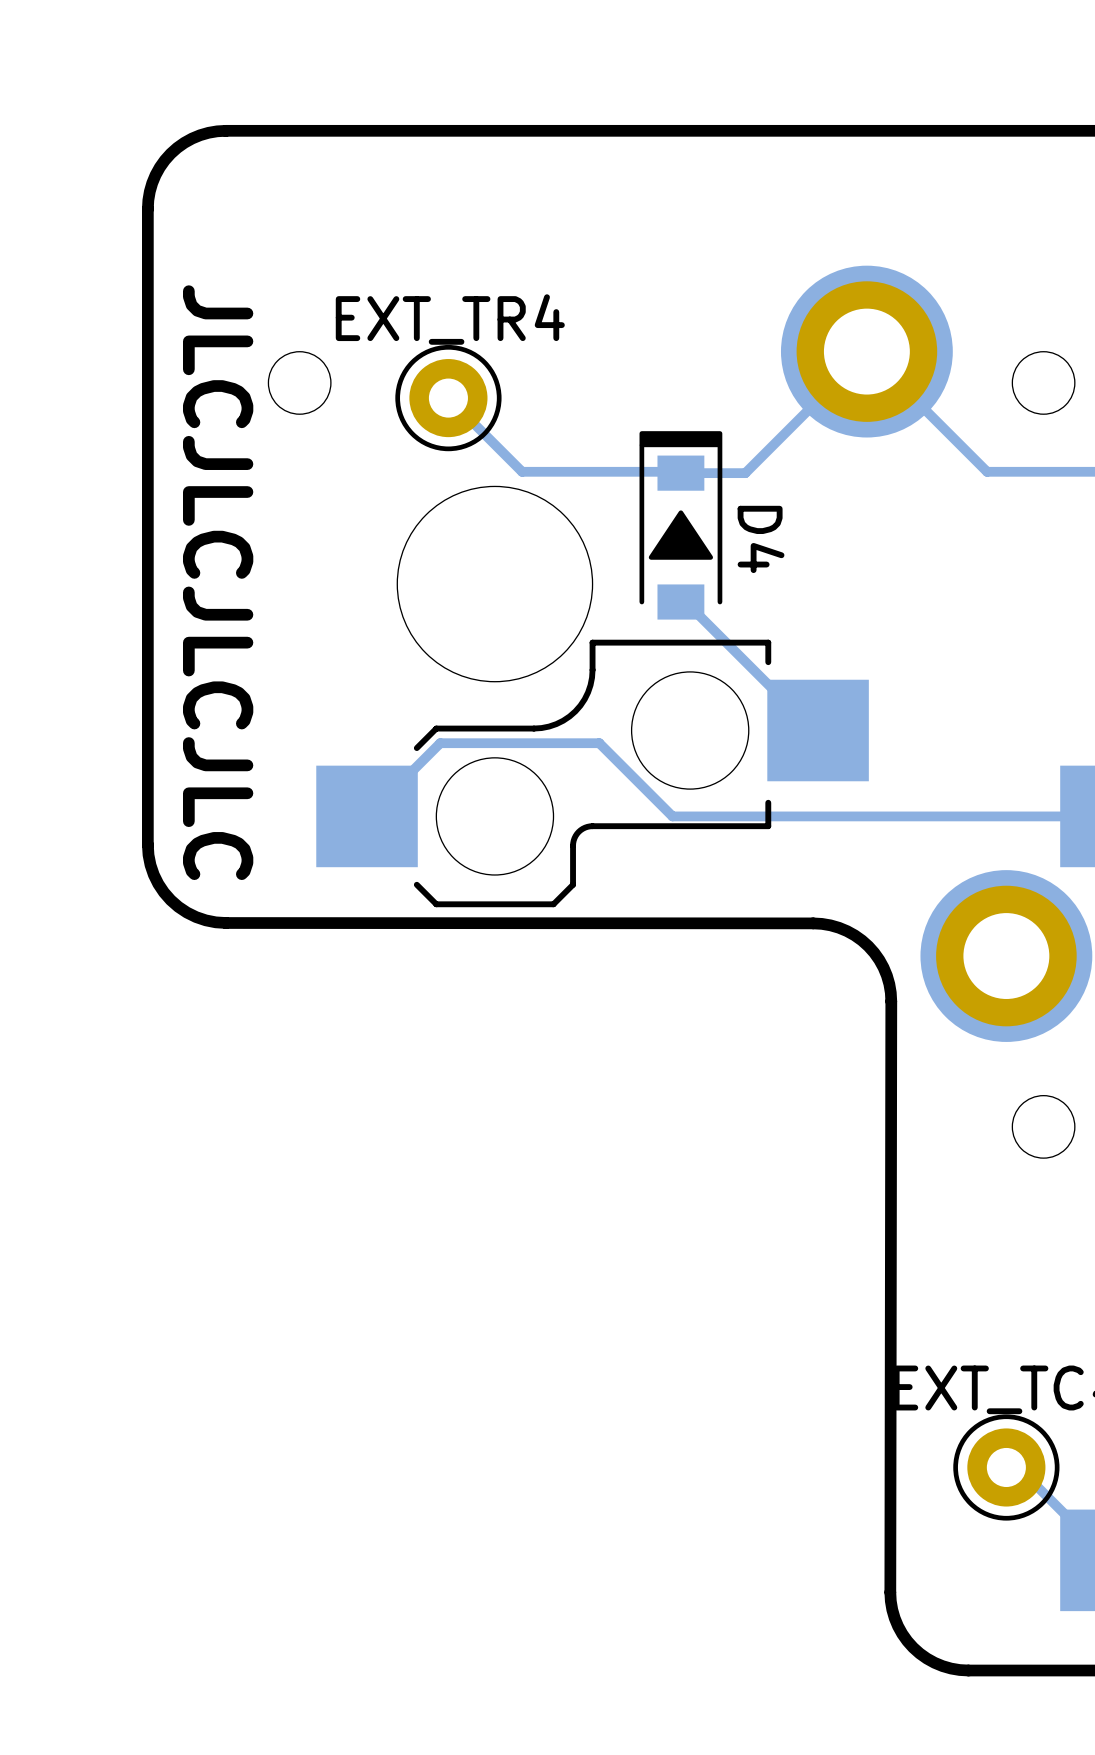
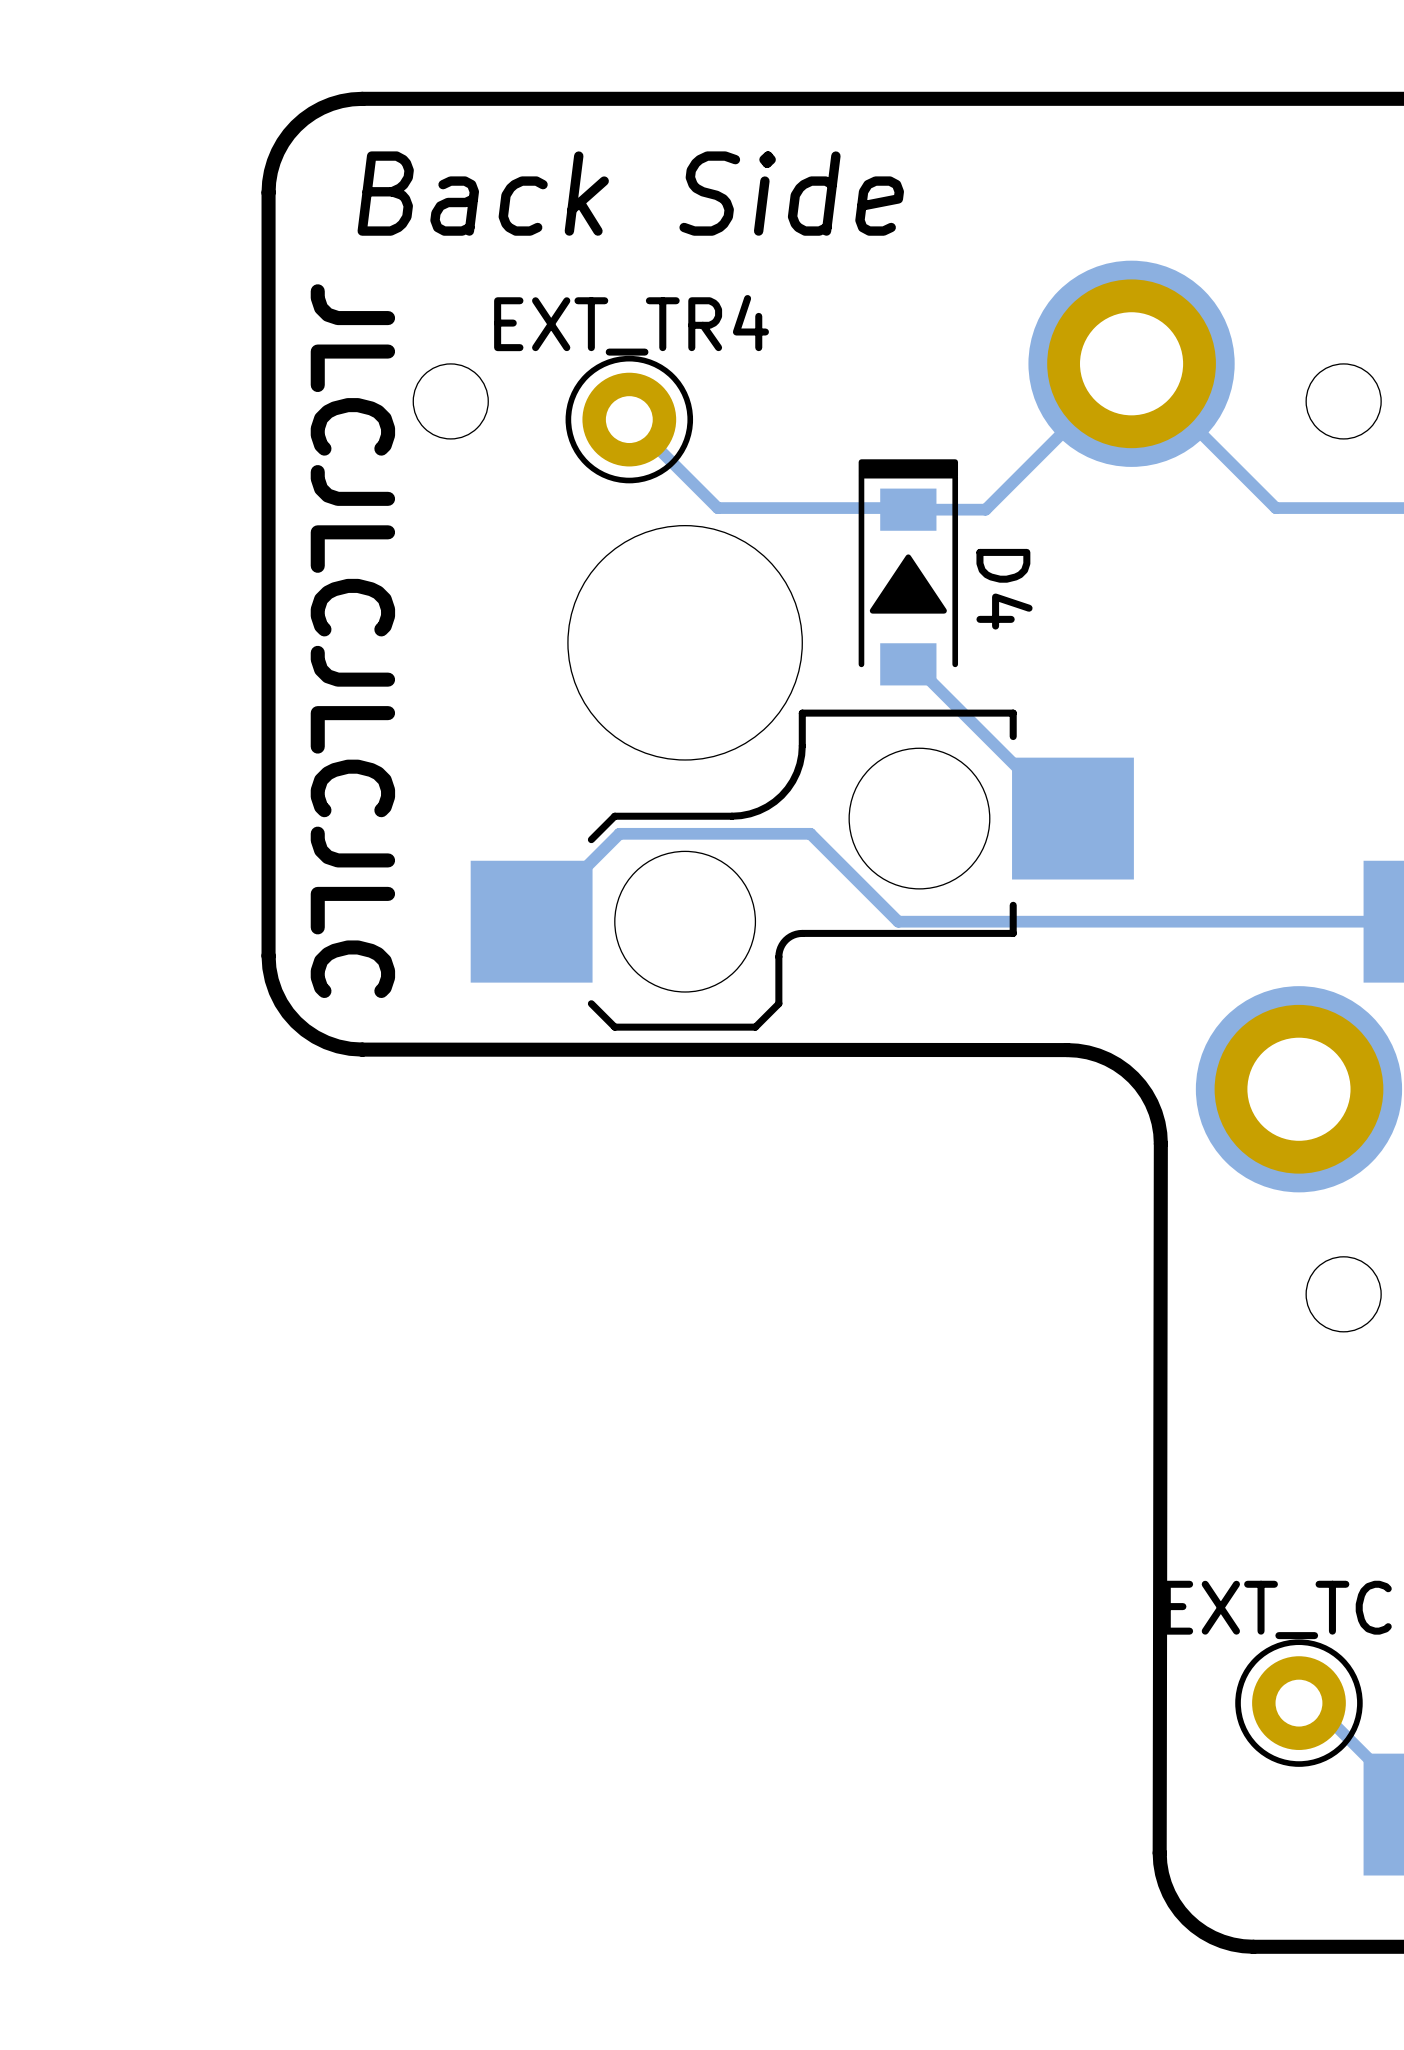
text: none -> Back Side (630, 193)

